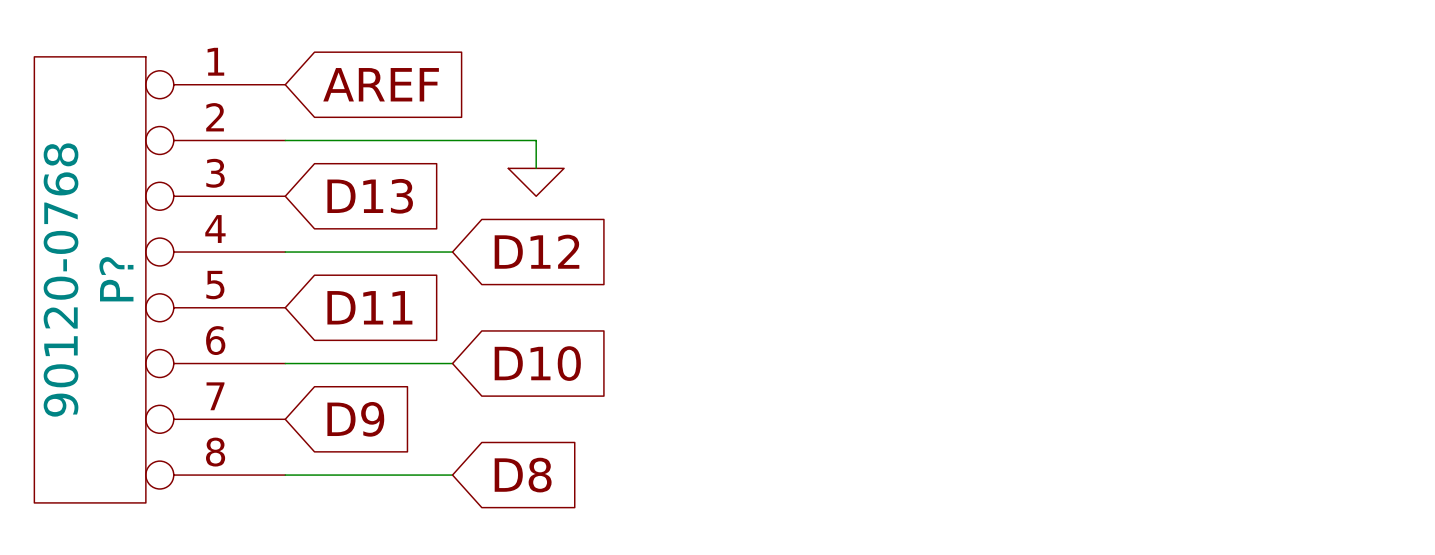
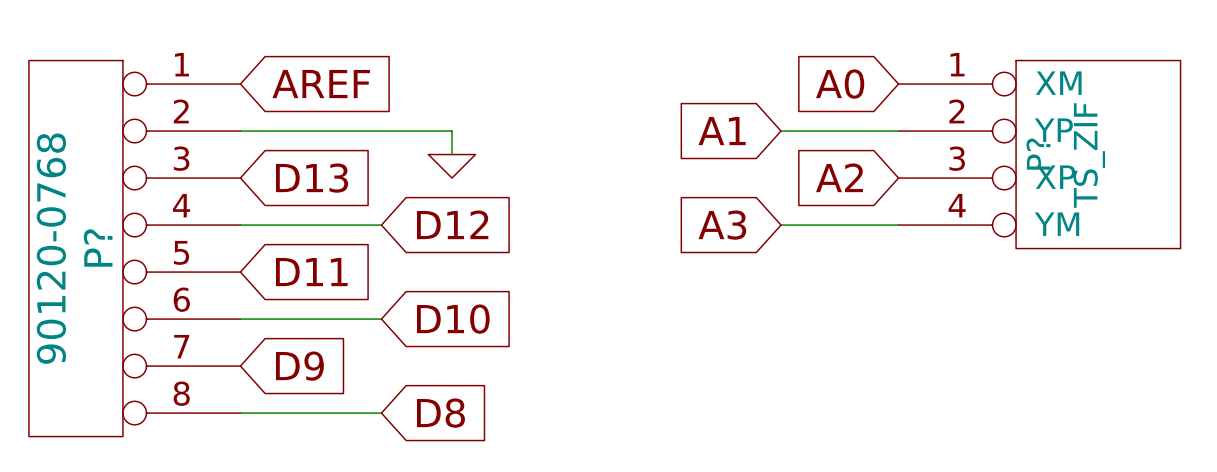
global label: none -> A0 (840, 84)
global label: none -> A1 (722, 131)
wire: none -> (781, 131) (898, 131)
P?: none -> TS_ZIF (1039, 154)
global label: none -> A2 (839, 177)
global label: none -> A3 (722, 225)
wire: none -> (781, 225) (898, 225)

